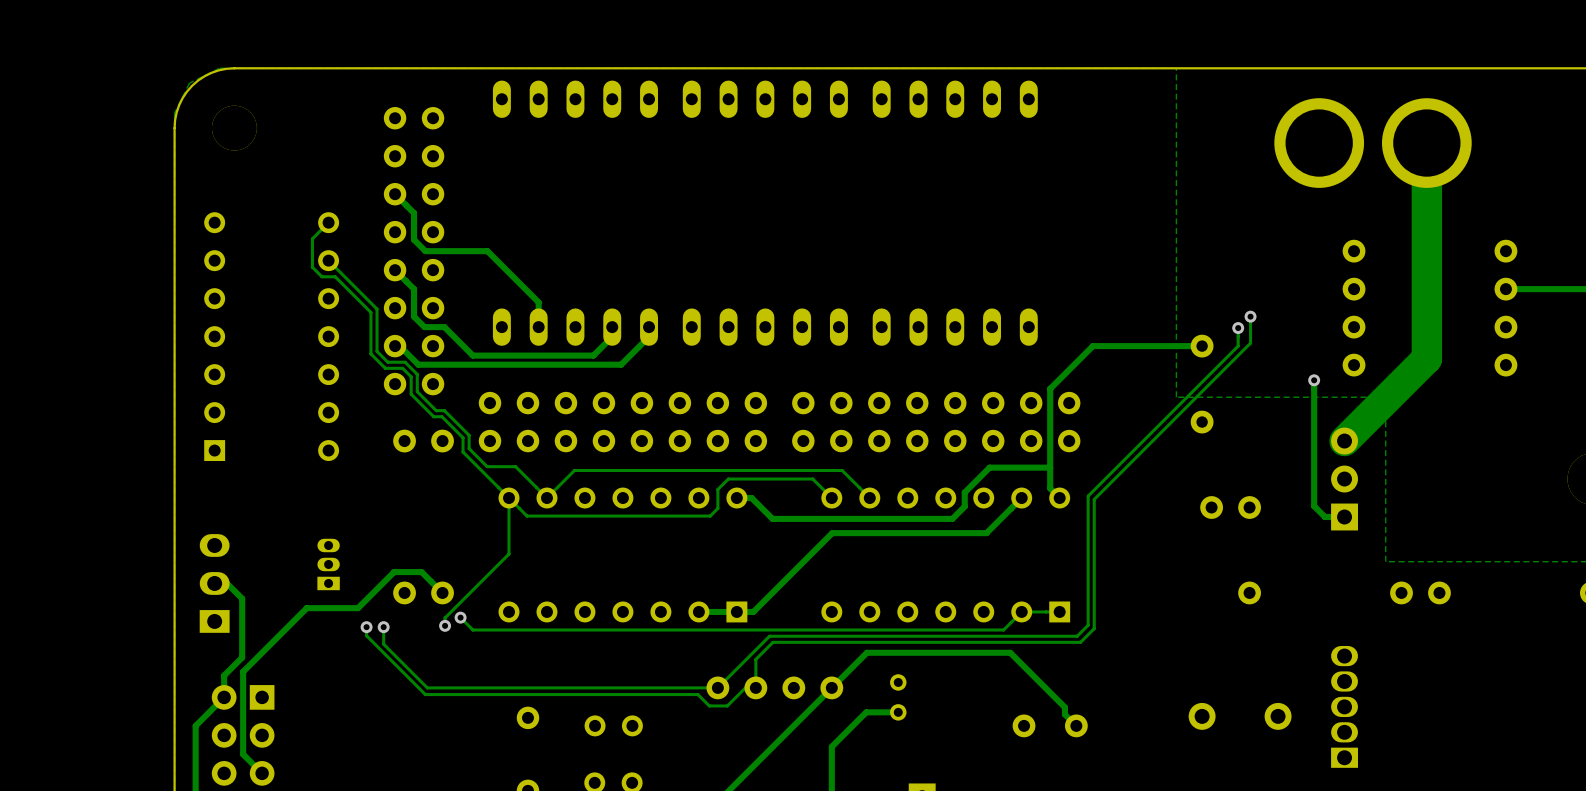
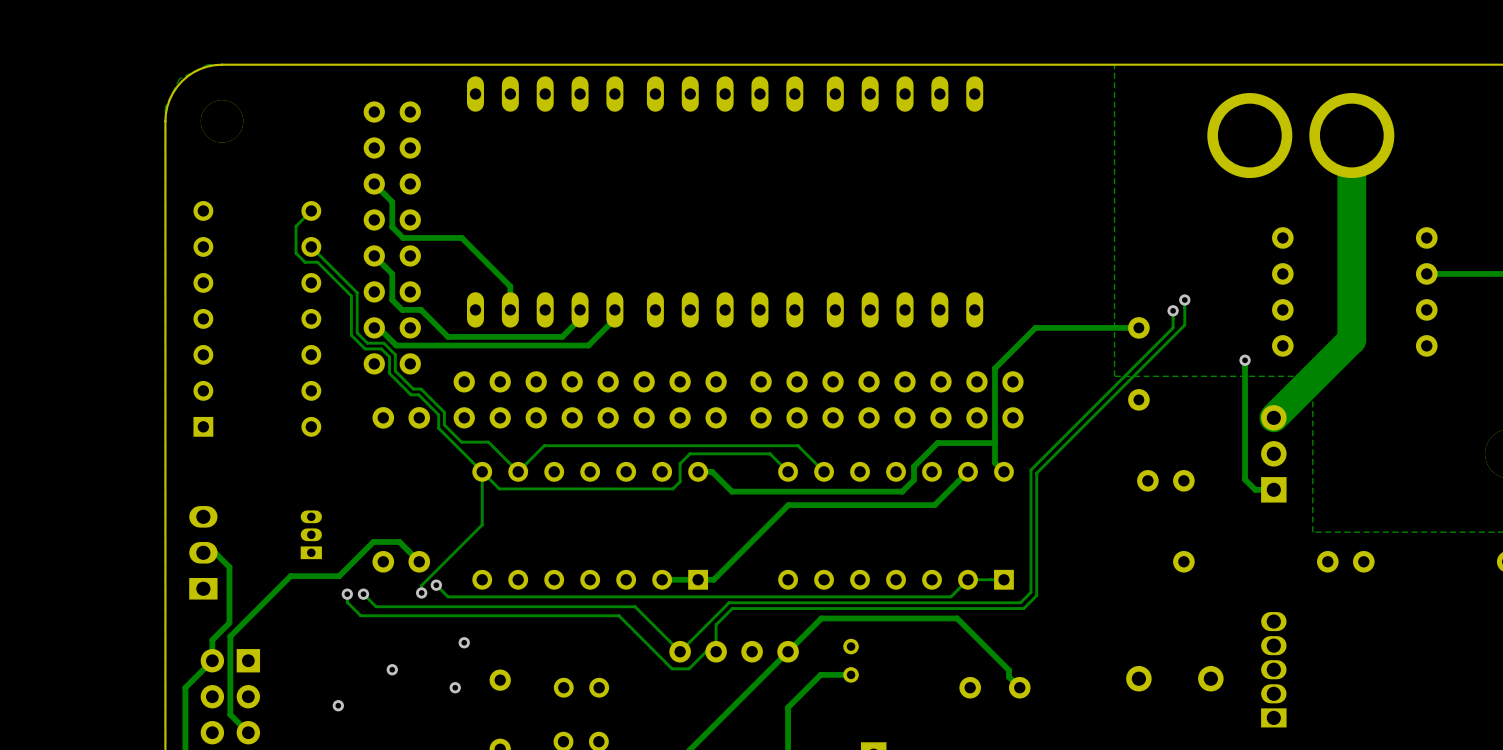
track: (383, 627) (383, 644) (427, 687) (717, 687) -> (363, 594) (376, 606) (635, 606) (680, 651)
track: (380, 649) (425, 694) (697, 694) -> (360, 615) (618, 615) (661, 658)
via: none -> (464, 642)
via: none -> (392, 669)
via: none -> (455, 687)
via: none -> (338, 705)

